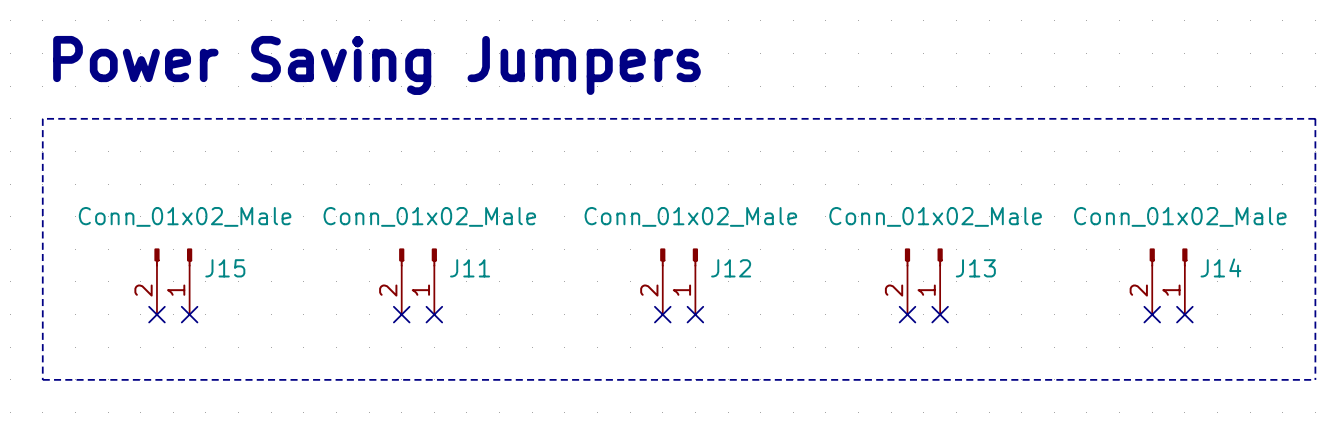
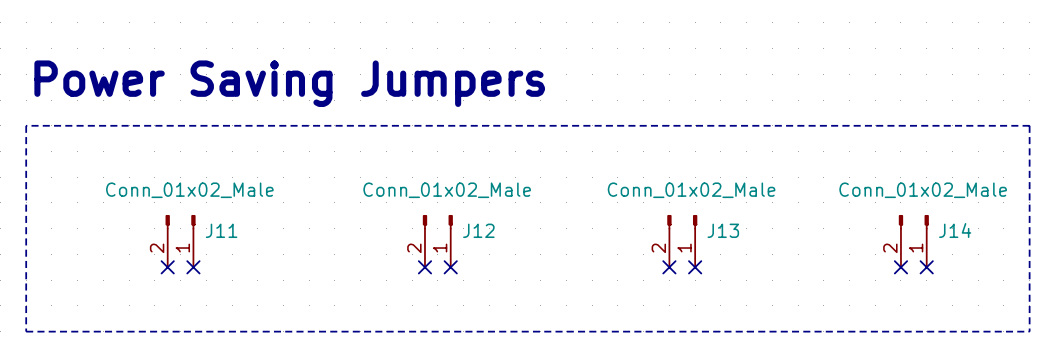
J15: Conn_01x02_Male (173, 281) -> none
J11 position: (418, 281) -> (180, 241)
J12 position: (679, 281) -> (437, 241)
J13 position: (923, 281) -> (682, 241)
J14 position: (1168, 281) -> (913, 241)
no-connect mark: none -> (167, 267)
no-connect mark: none -> (193, 267)
no-connect mark: none -> (424, 267)
no-connect mark: none -> (450, 267)
no-connect mark: none -> (669, 267)
no-connect mark: (156, 314) -> none
no-connect mark: (189, 314) -> none
no-connect mark: (401, 314) -> none
no-connect mark: (434, 314) -> none
no-connect mark: (662, 314) -> none
no-connect mark: (695, 314) -> none
no-connect mark position: (907, 314) -> (695, 267)
no-connect mark: (940, 314) -> none
no-connect mark position: (1152, 314) -> (900, 267)
no-connect mark position: (1184, 314) -> (926, 267)

